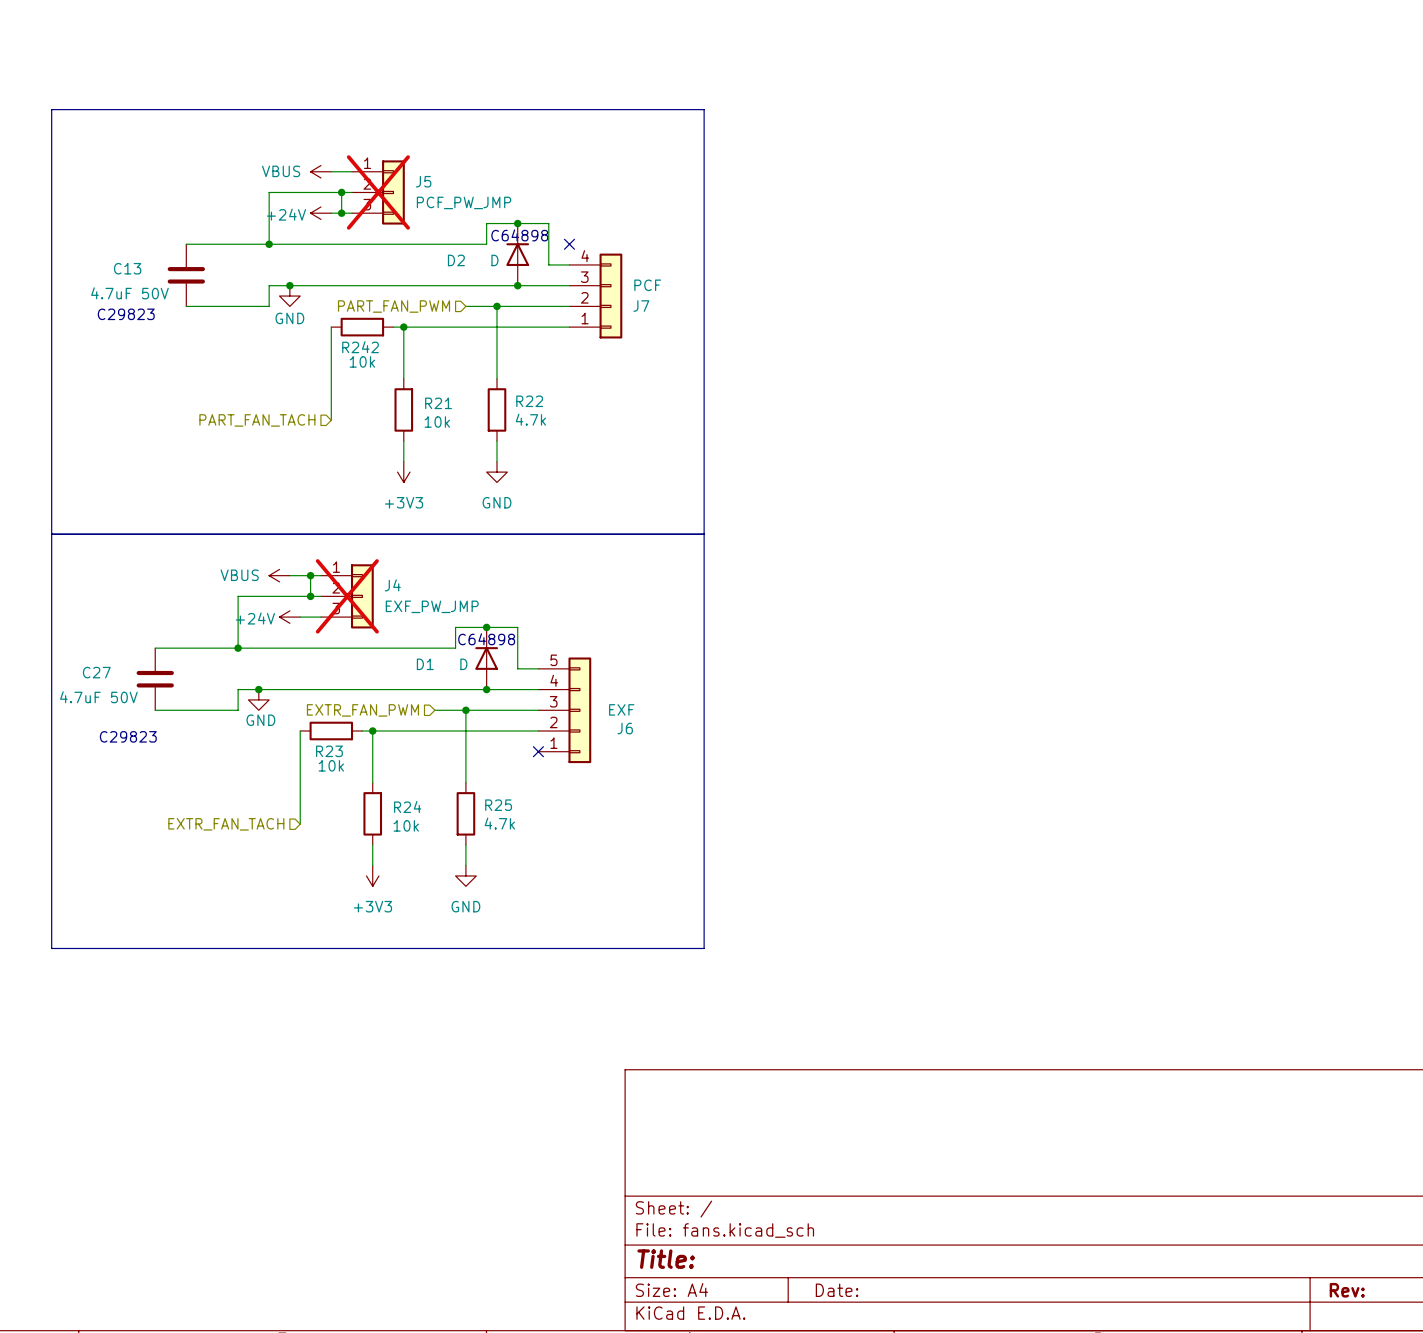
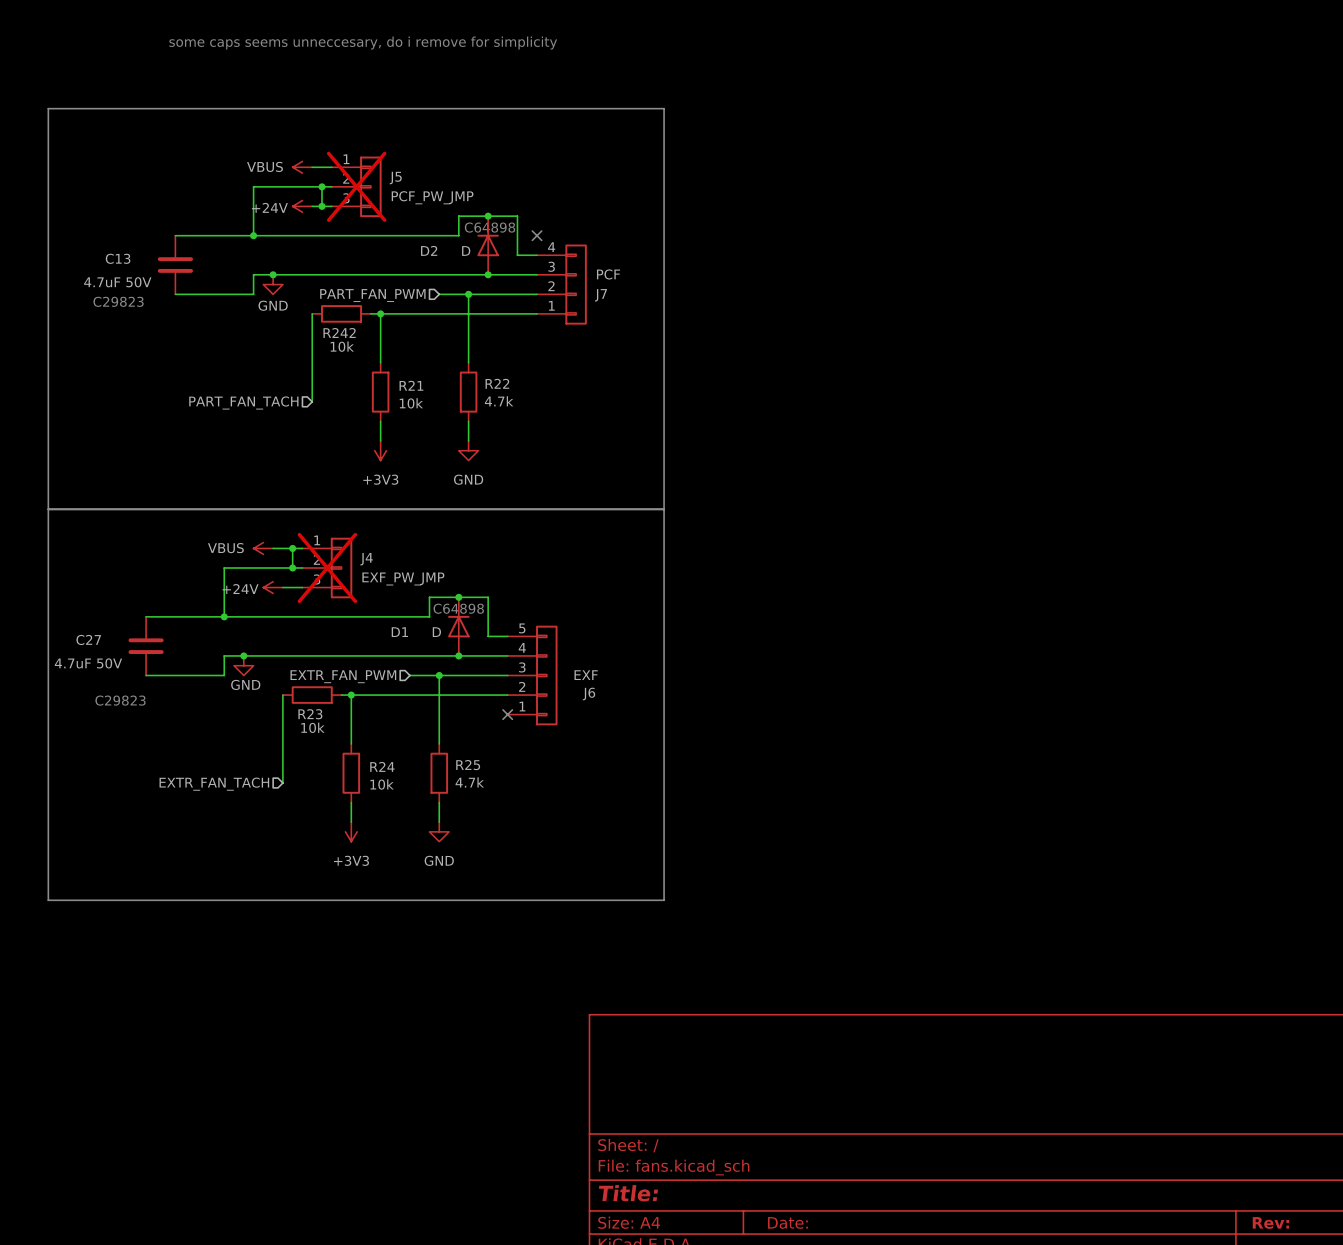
text: none -> some caps seems unneccesary, do i remove for simplicity (363, 43)

